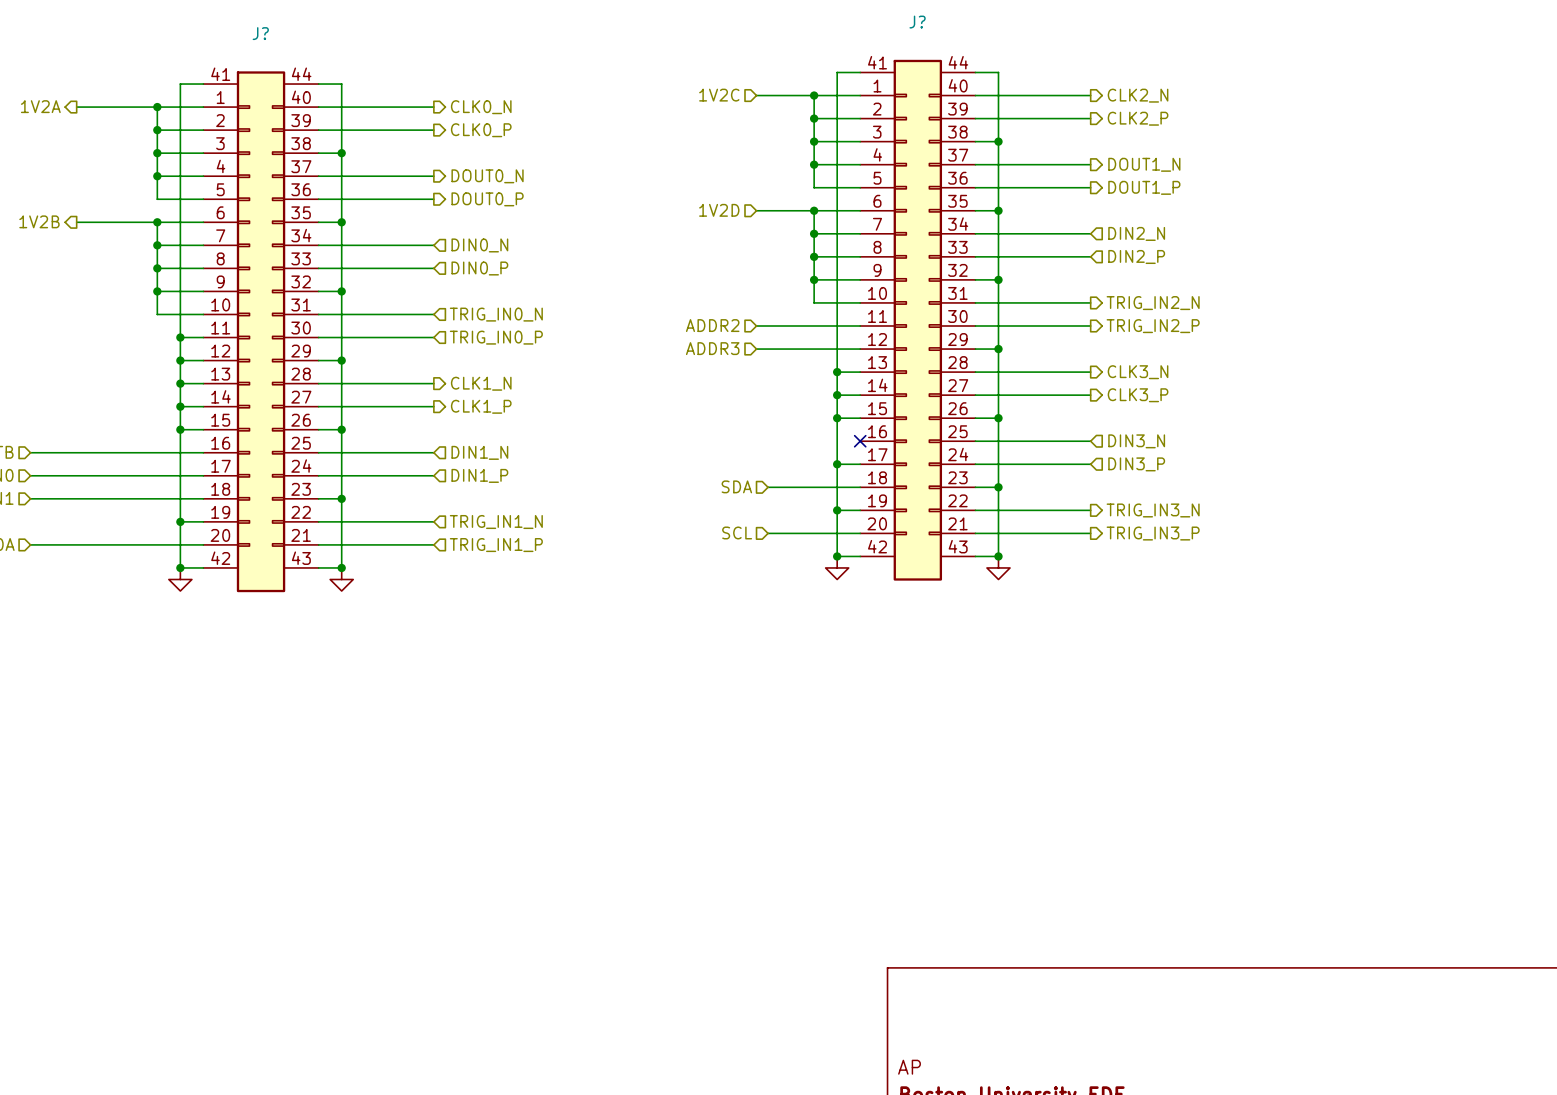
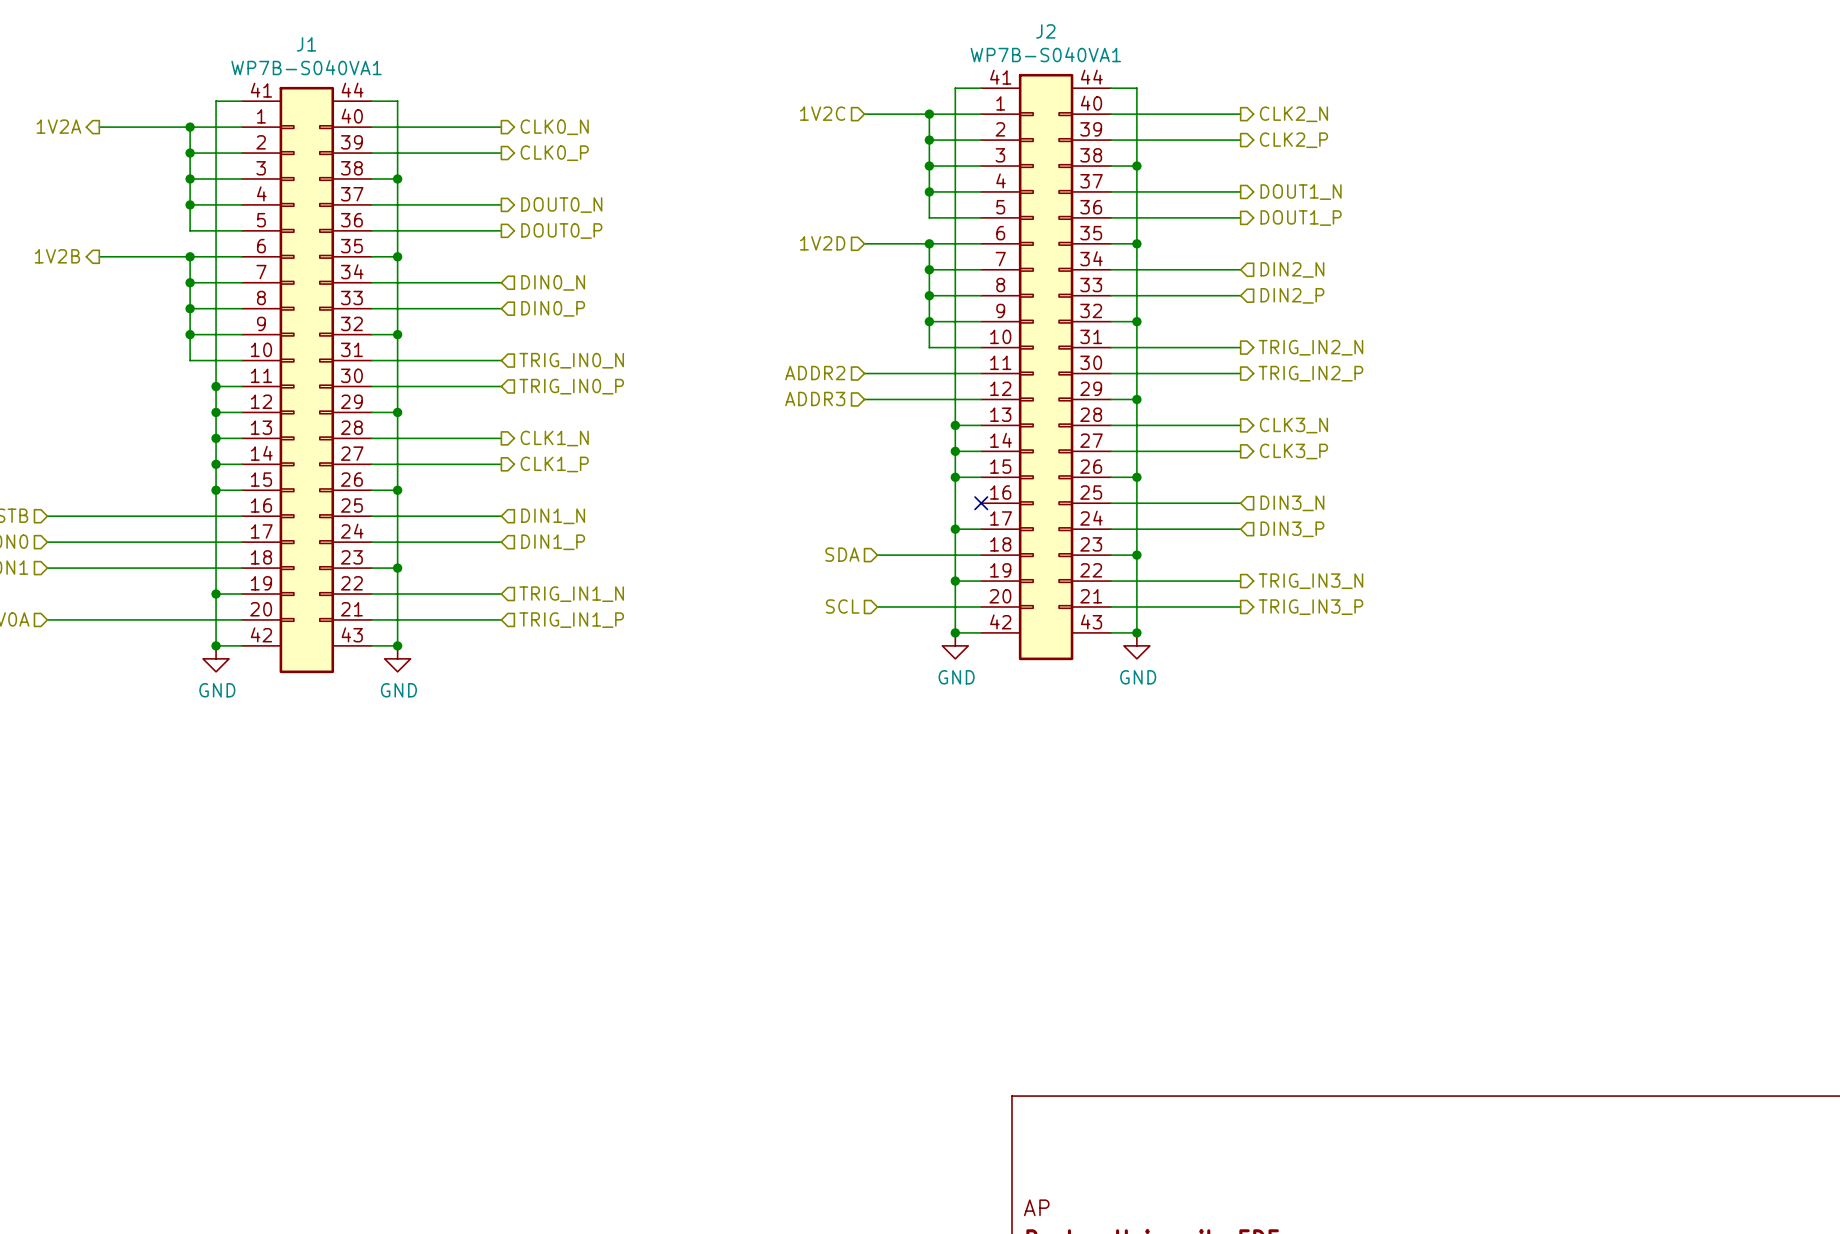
J? name: J? (917, 22) -> J2 (1045, 31)
J? name: J? (260, 33) -> J1 (306, 44)
J? value: none -> WP7B-S040VA1 (1045, 54)
J? value: none -> WP7B-S040VA1 (306, 67)
power symbol text: none -> GND (956, 677)
power symbol text: none -> GND (1138, 677)
power symbol text: none -> GND (217, 690)
power symbol text: none -> GND (398, 690)

